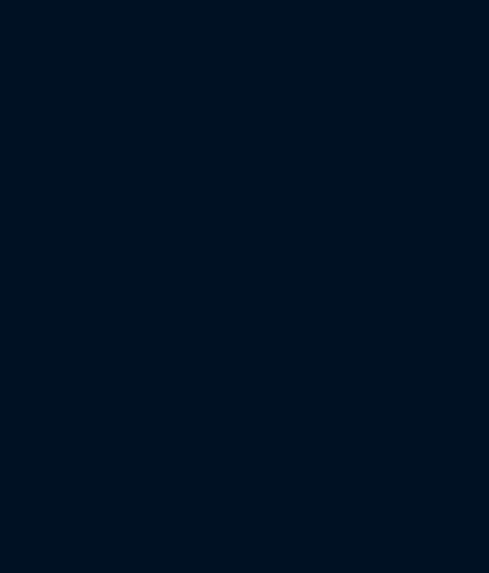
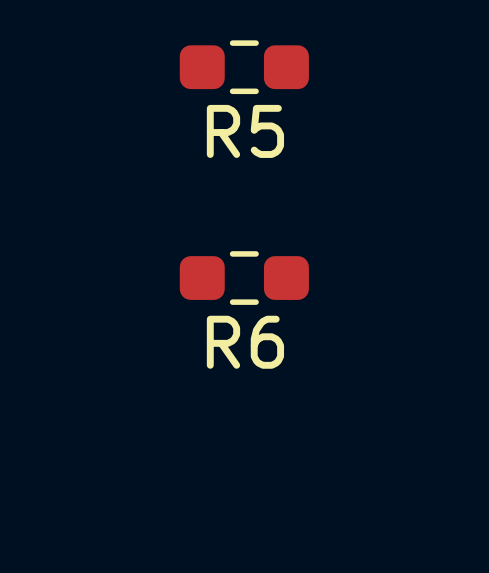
R5: none -> (244, 67)
R6: none -> (244, 278)

